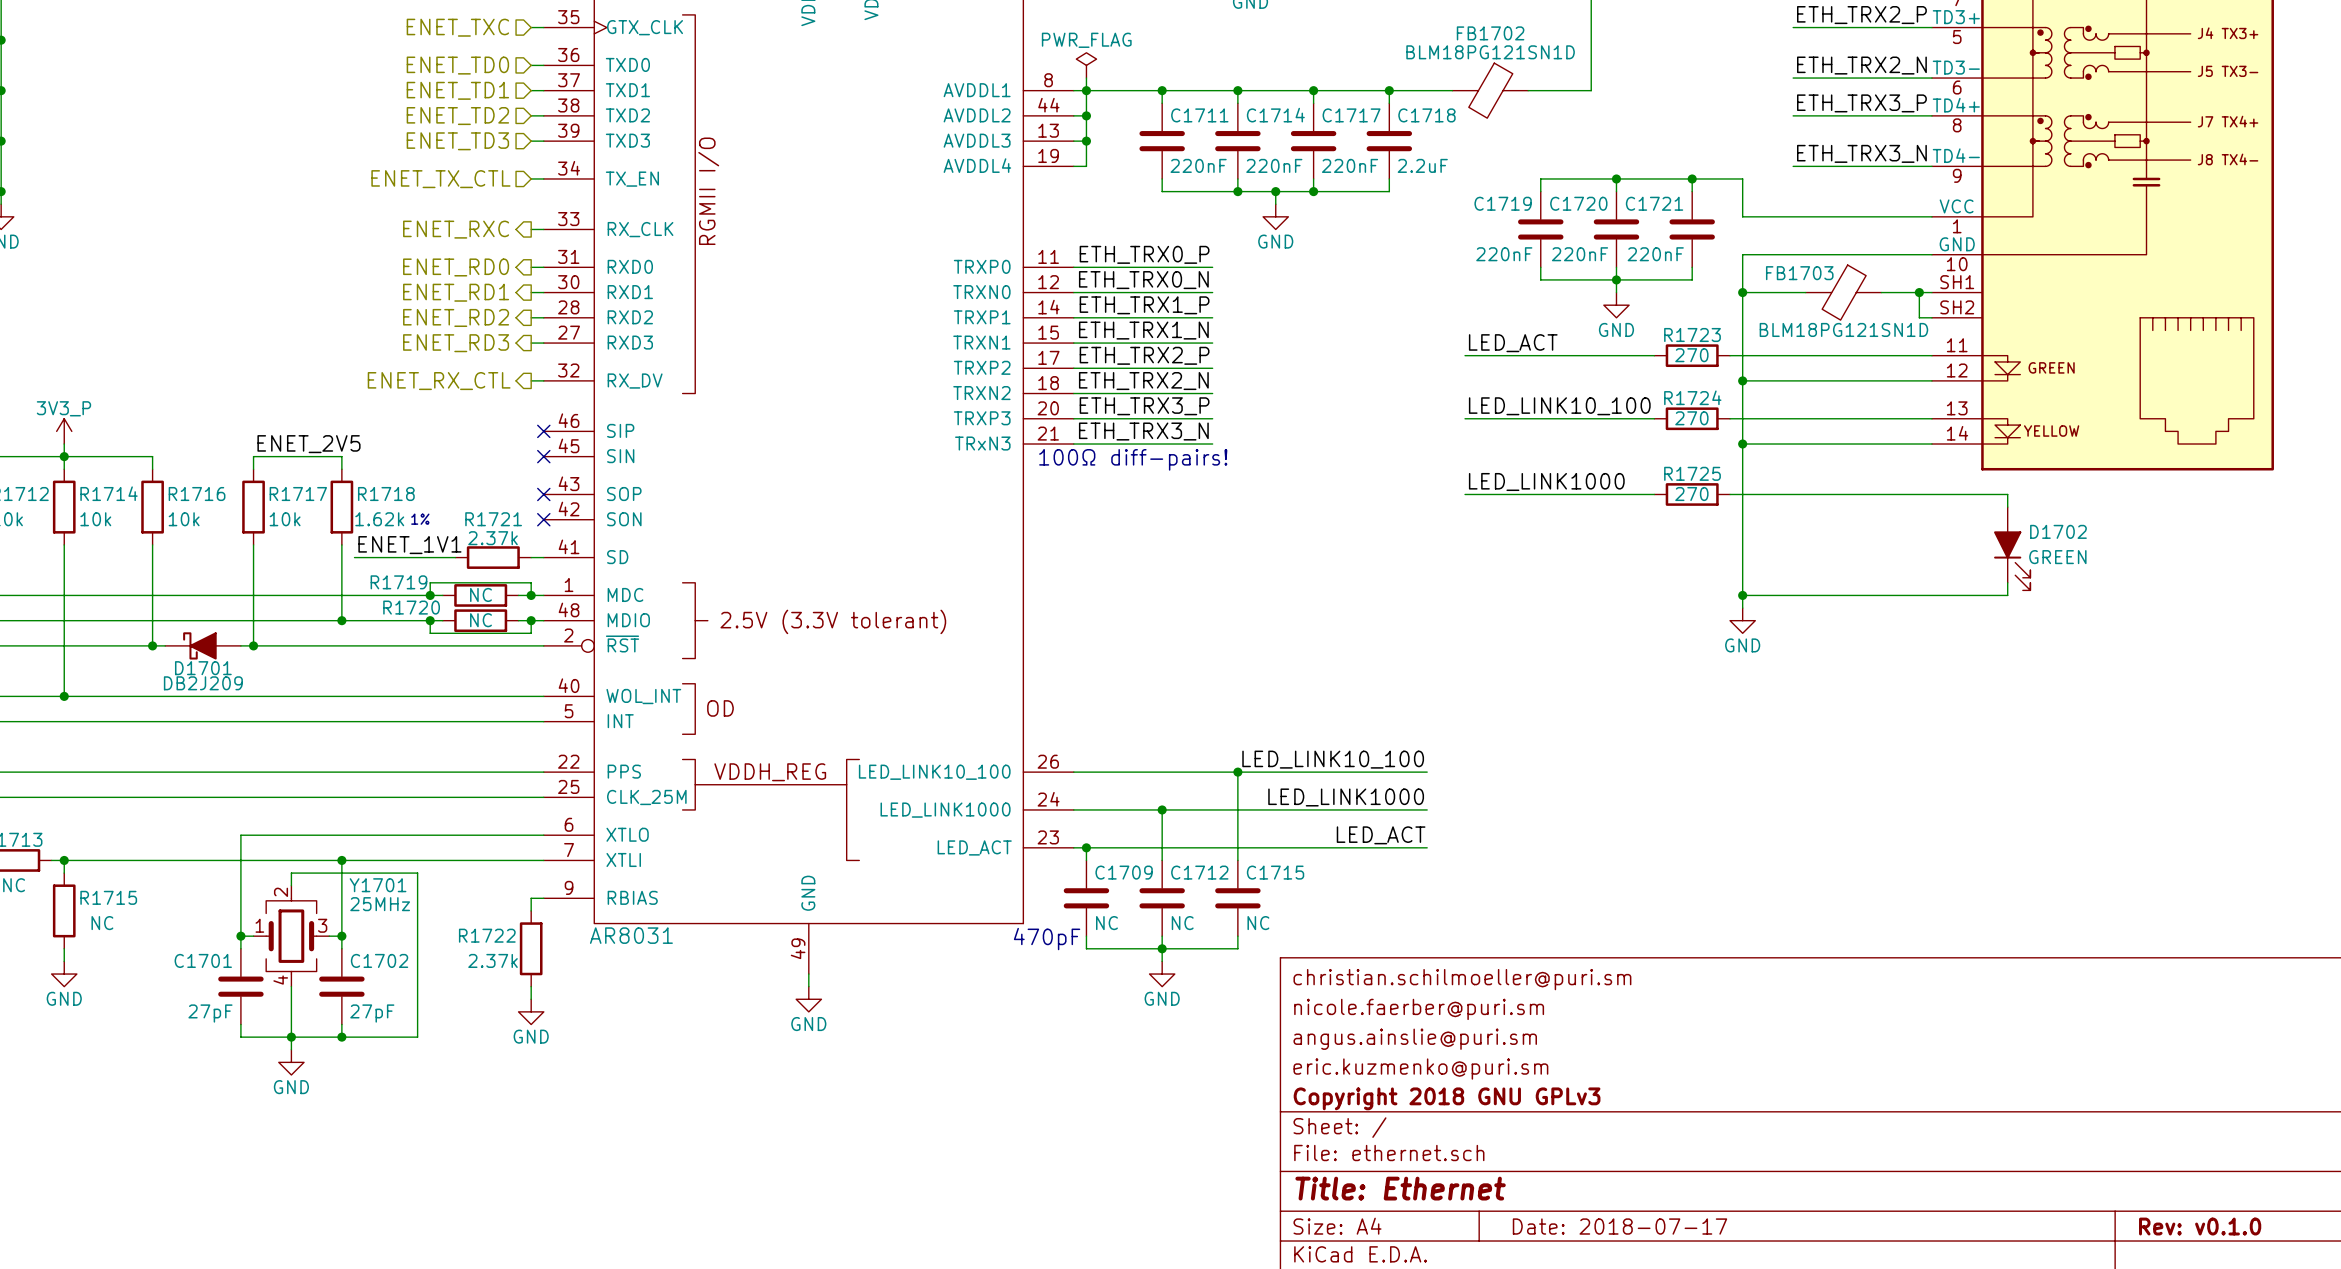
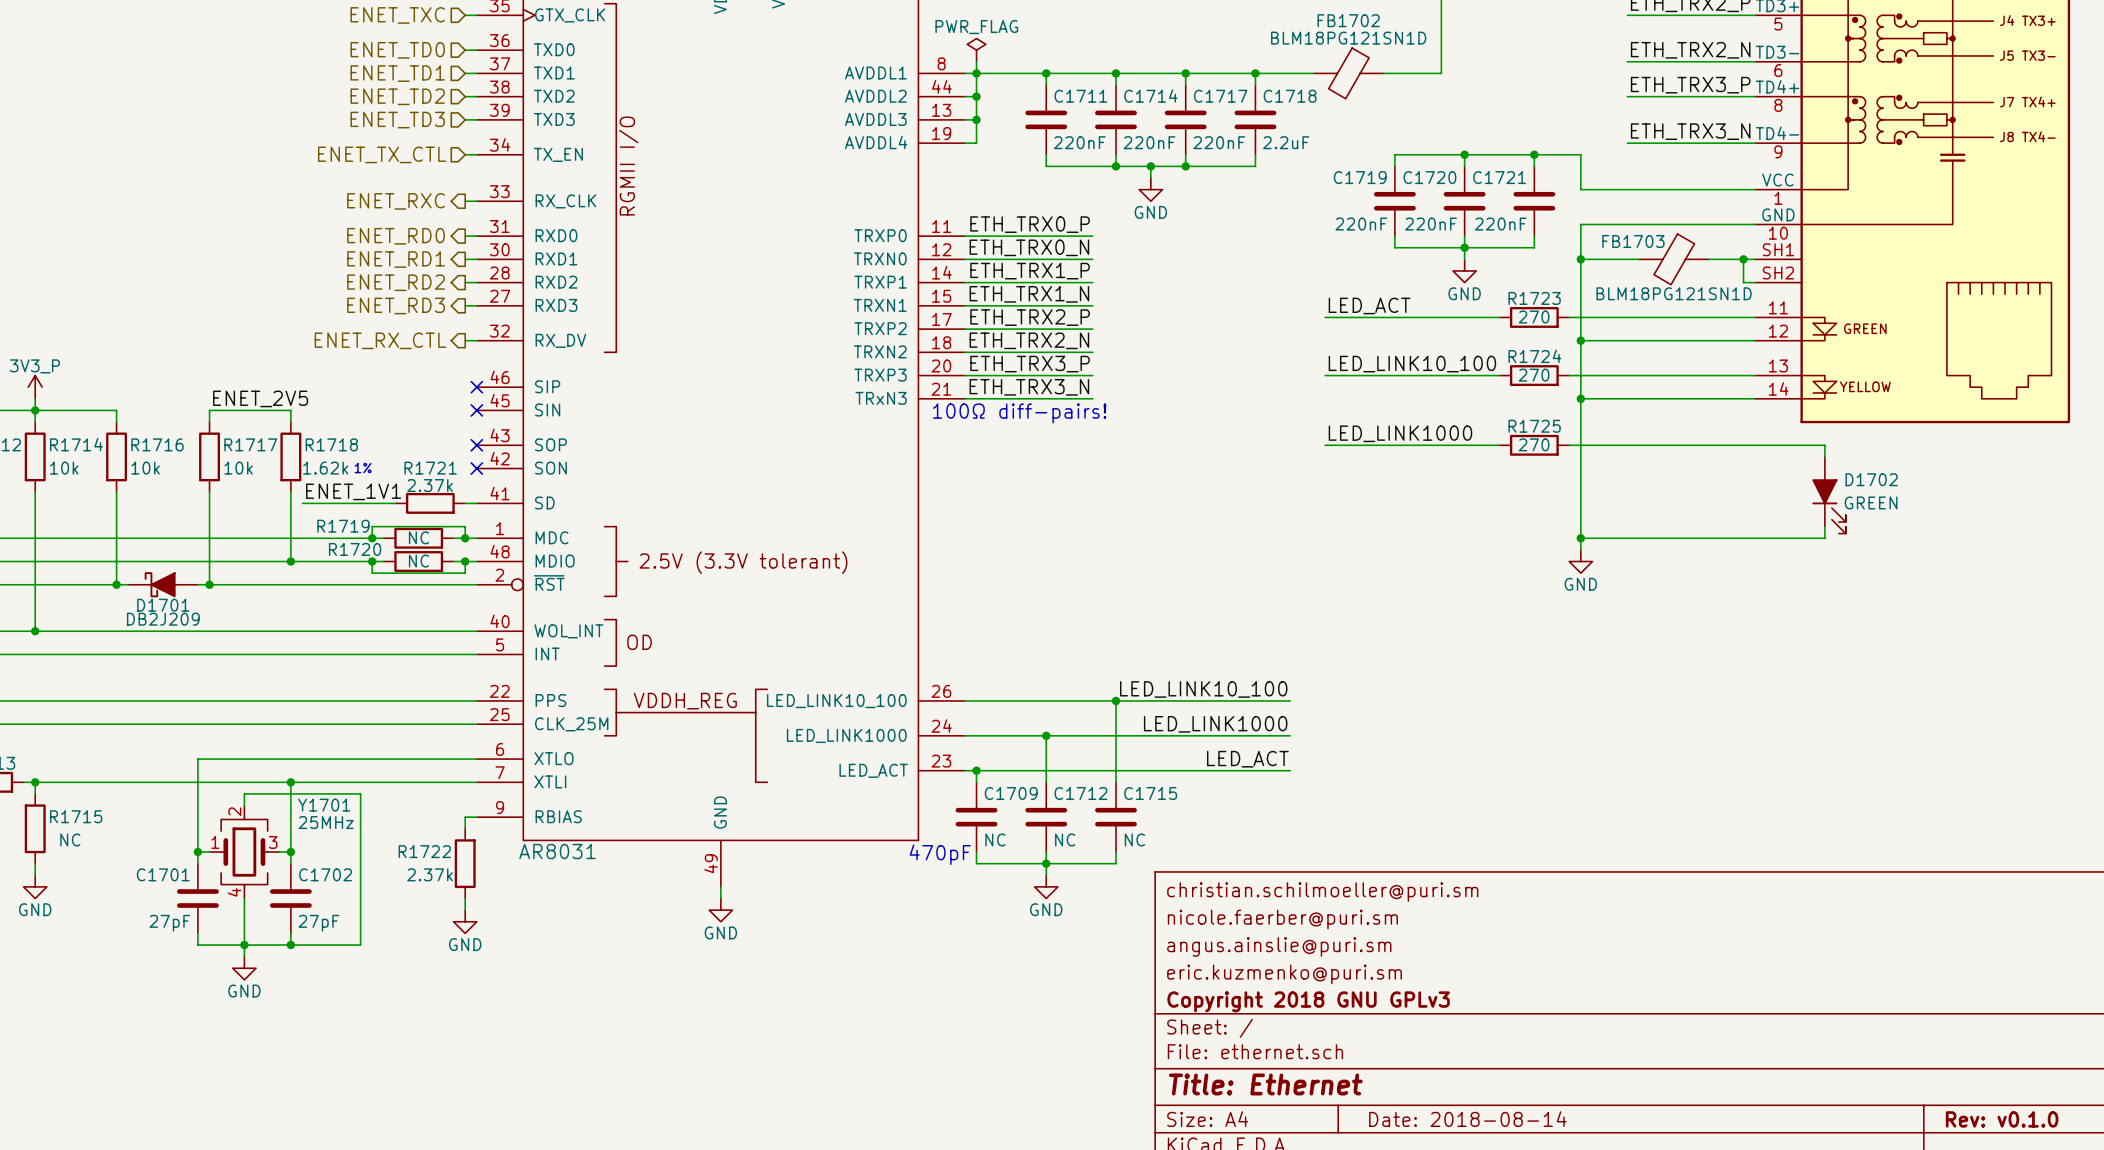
title block: Date: 2018-07-17 (1619, 1226) -> Date: 2018-08-14 (1467, 1119)

